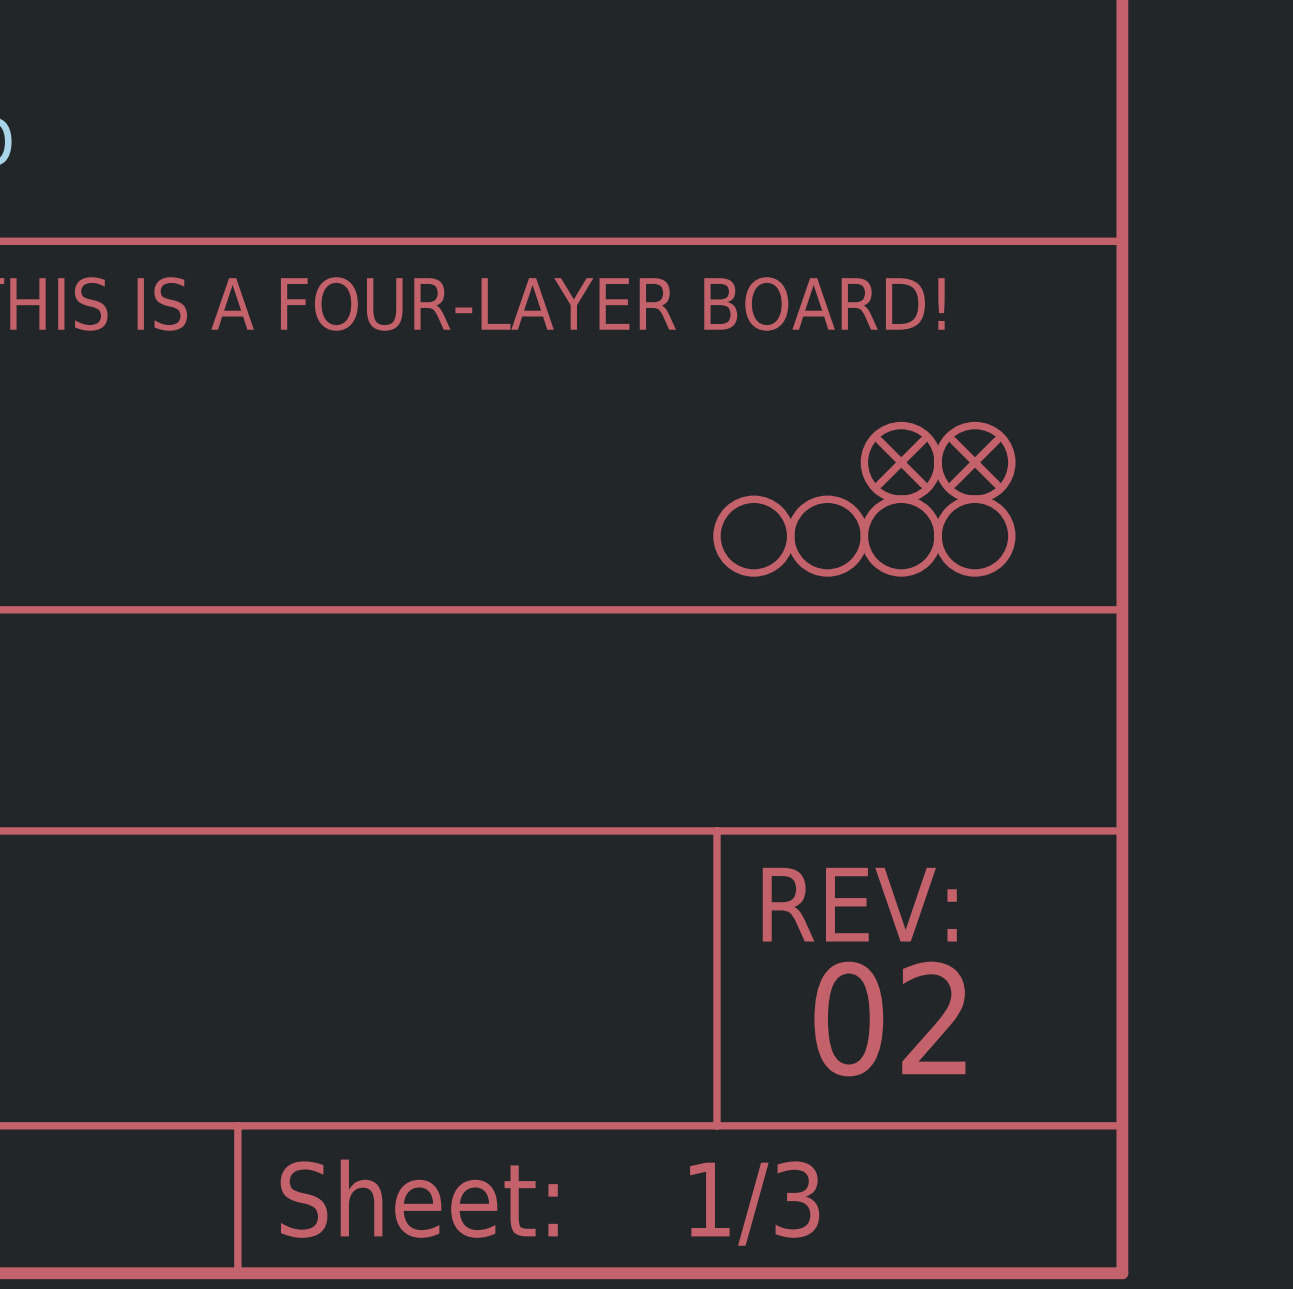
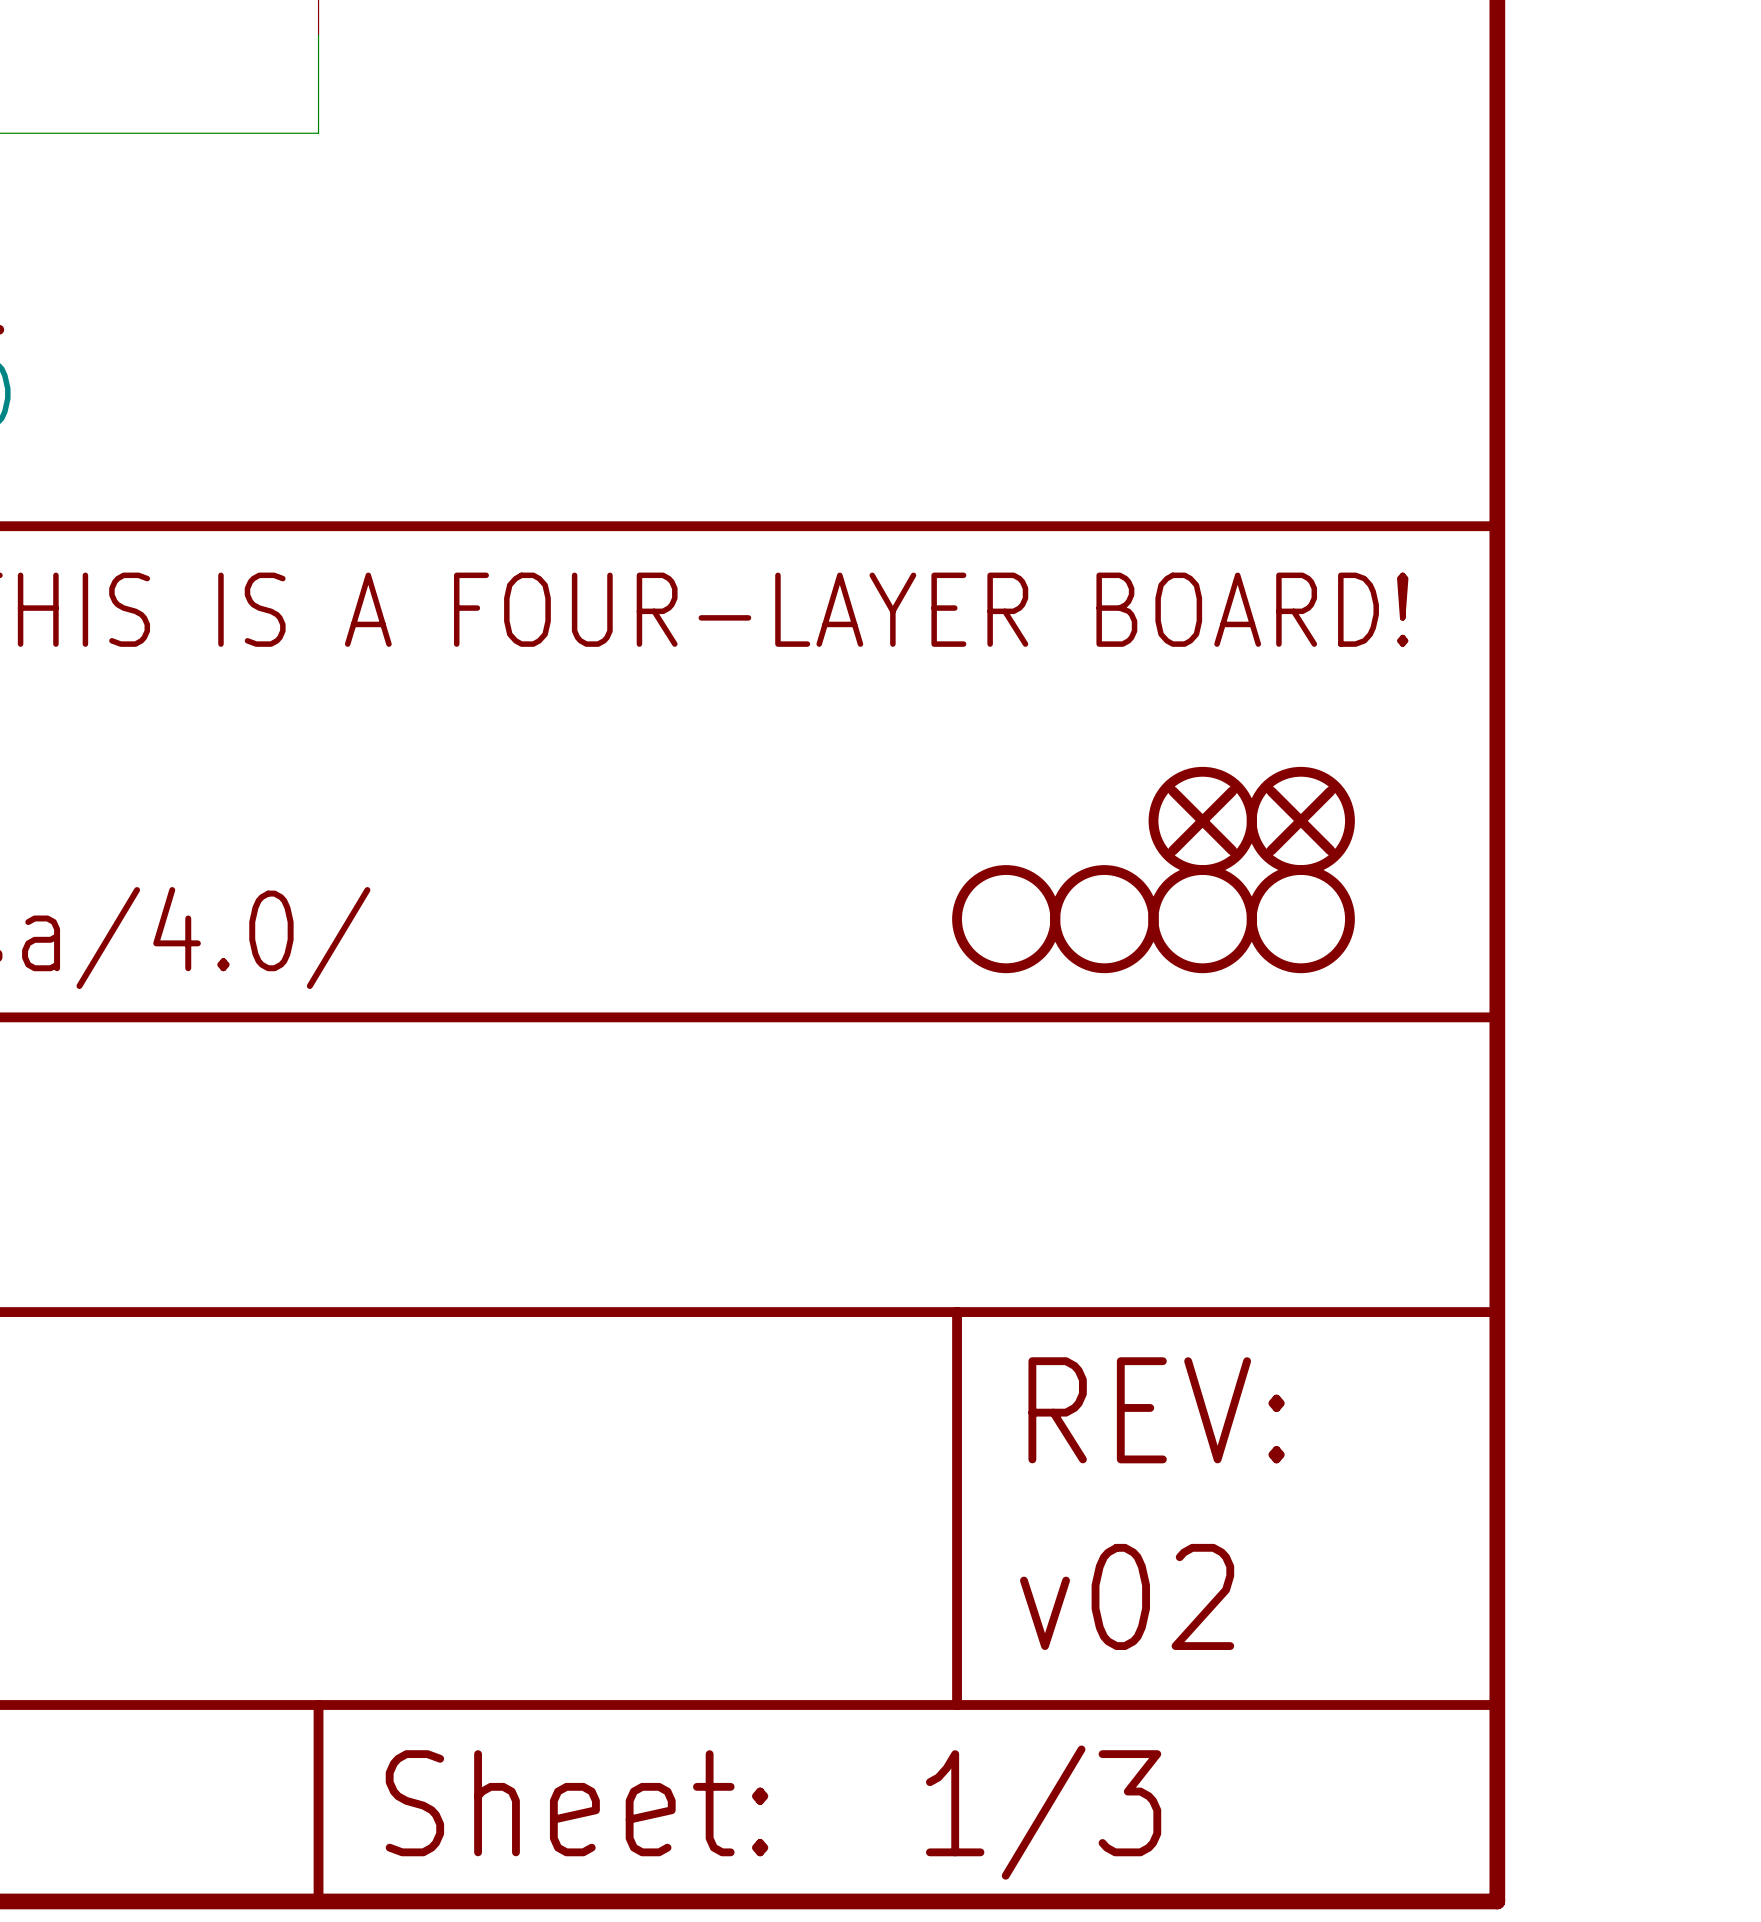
text: 02 (889, 1019) -> none
part text: none -> v02 (1127, 1596)

